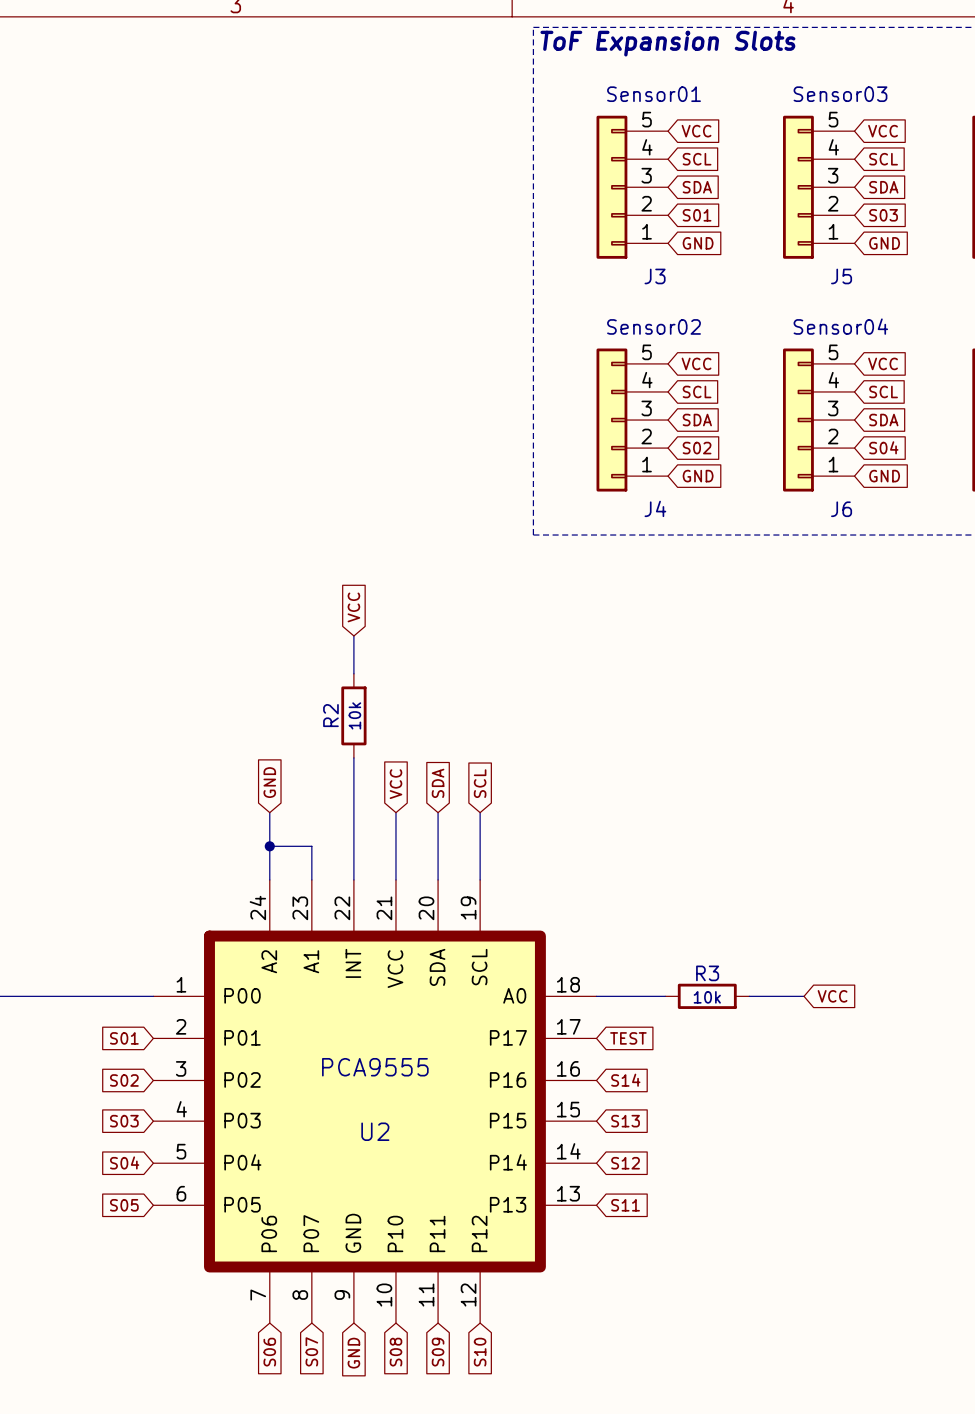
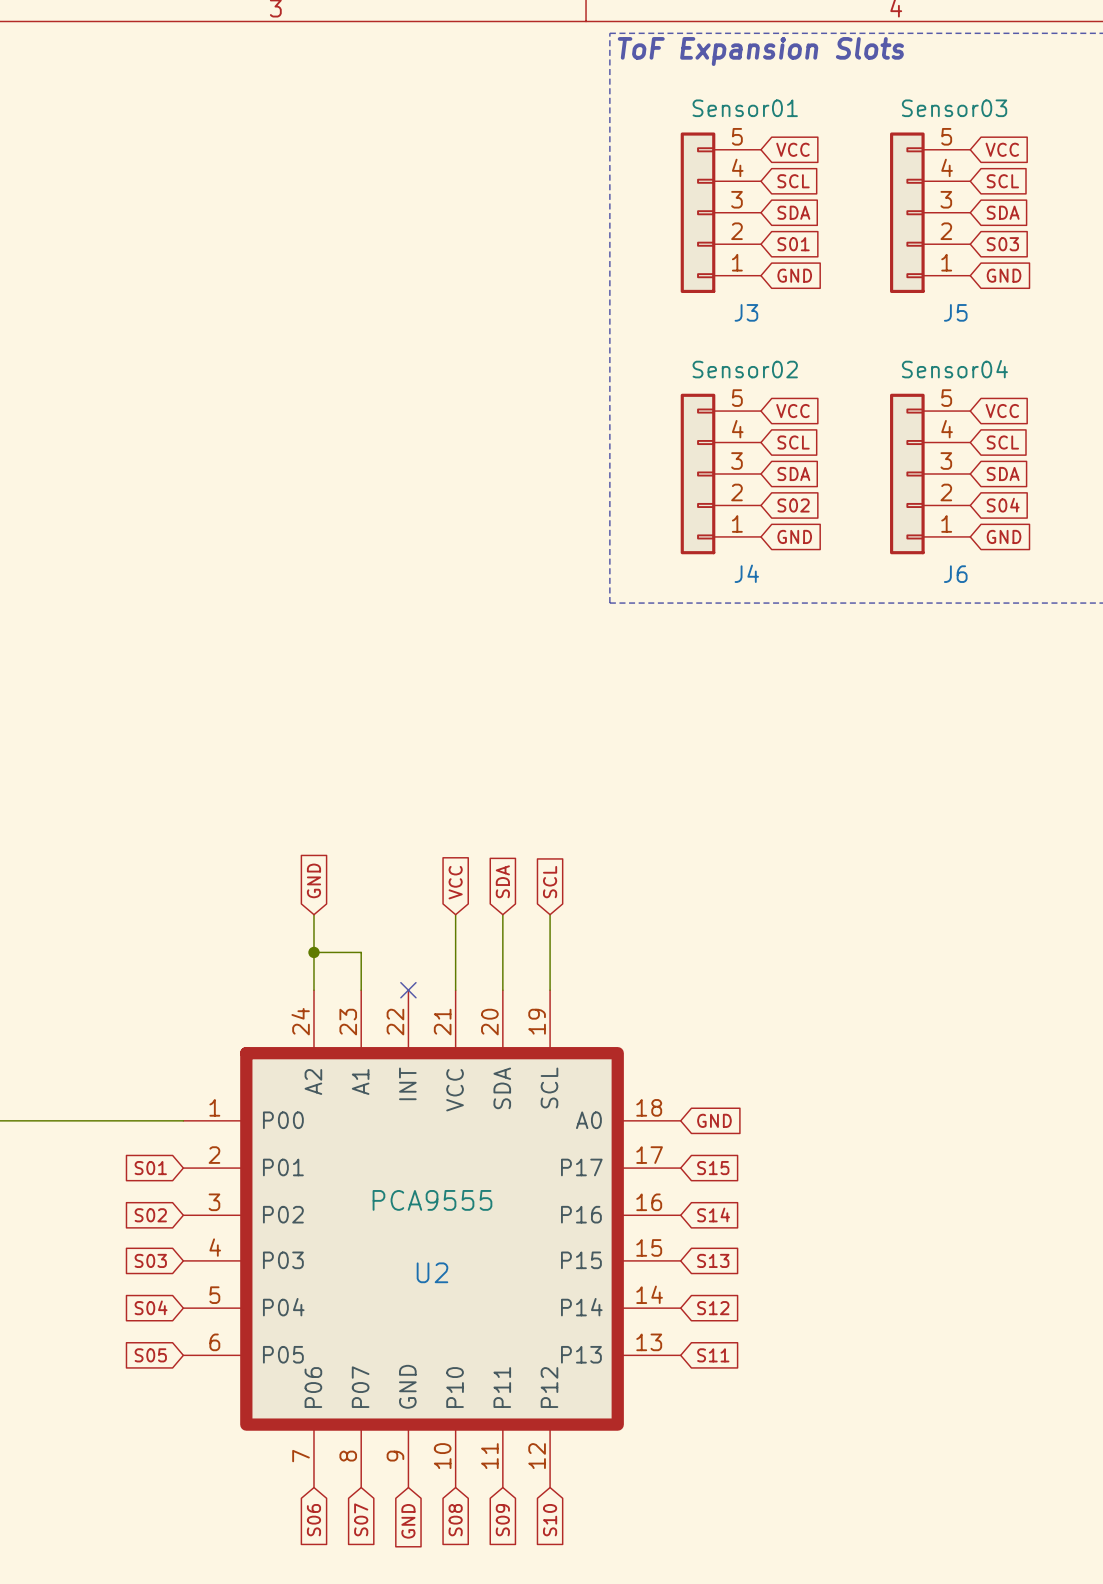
global label: VCC (353, 607) -> none
wire: (353, 635) (353, 673) -> none
R2: 10k (353, 715) -> none
wire: (353, 757) (353, 879) -> none
no-connect mark: none -> (408, 990)
wire: (596, 996) (665, 996) -> none
global label: none -> GND (714, 1120)
R3: 10k (707, 996) -> none
wire: (749, 996) (804, 996) -> none
global label: VCC (832, 996) -> none
global label: TEST (628, 1038) -> S15 (713, 1168)

